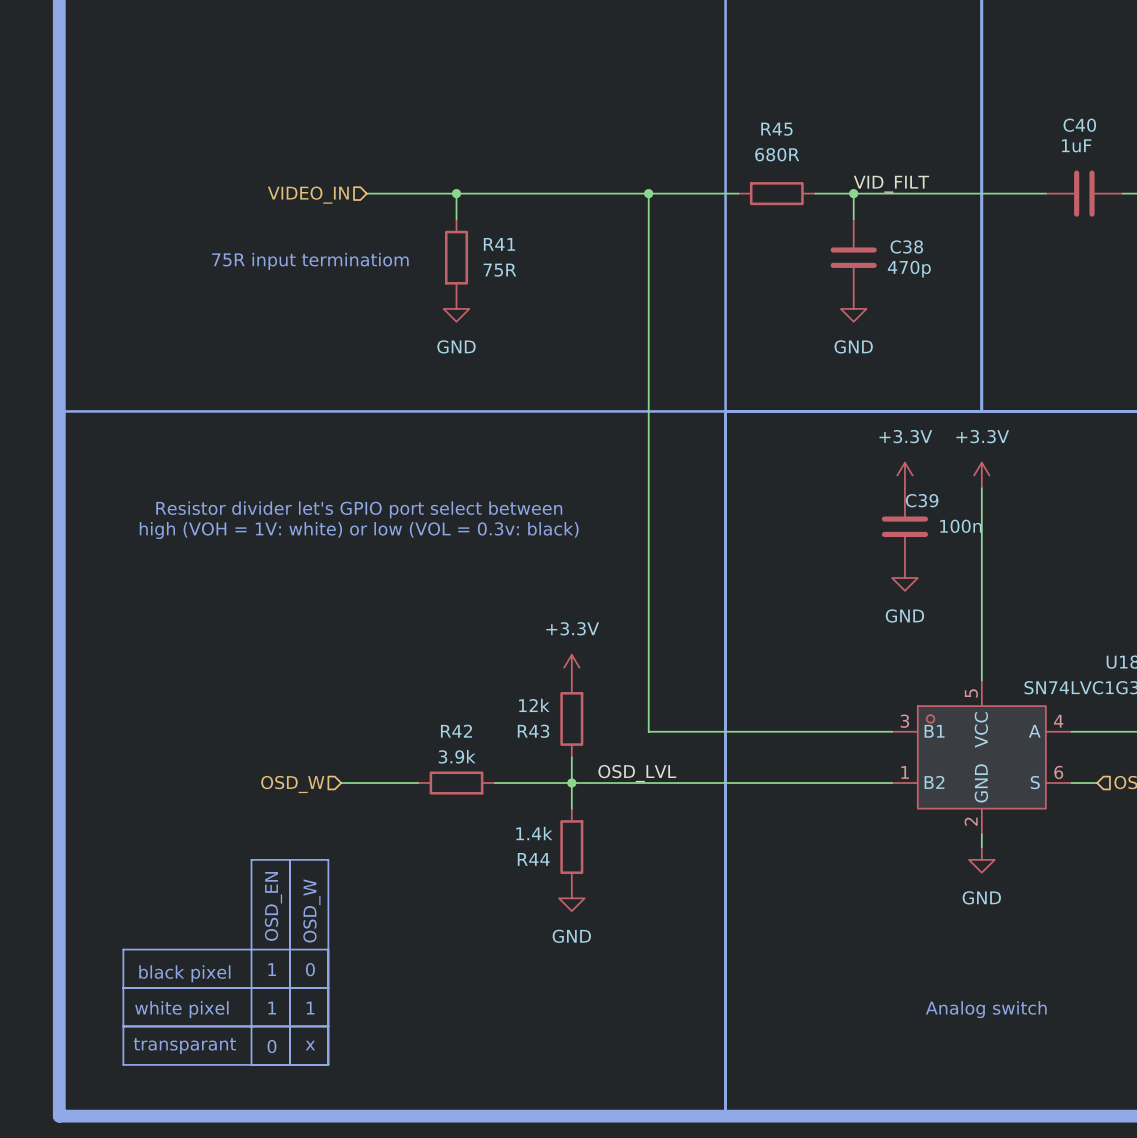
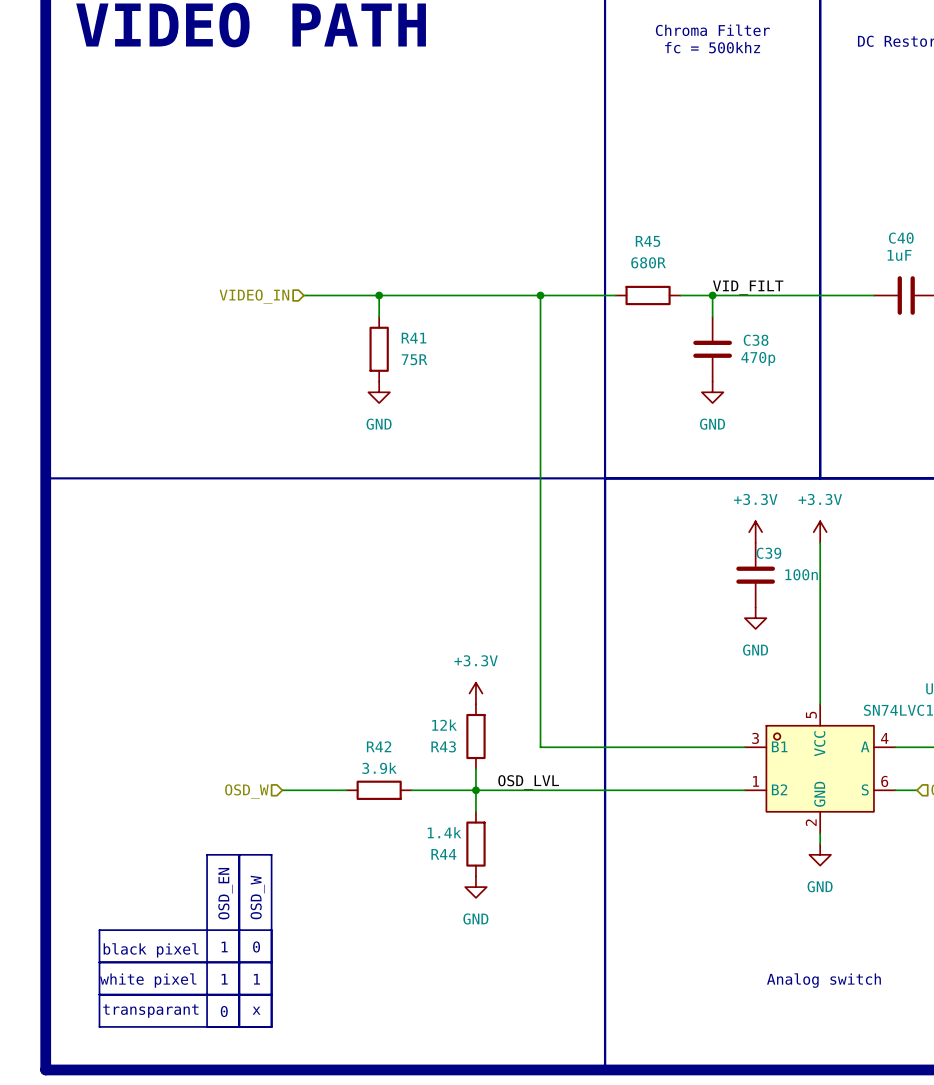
text: 75R input terminatiom (310, 261) -> none
text: Resistor divider let's GPIO port select between (359, 509) -> none
text: high (VOH = 1V: white) or low (VOL = 0.3v: black) (359, 530) -> none

